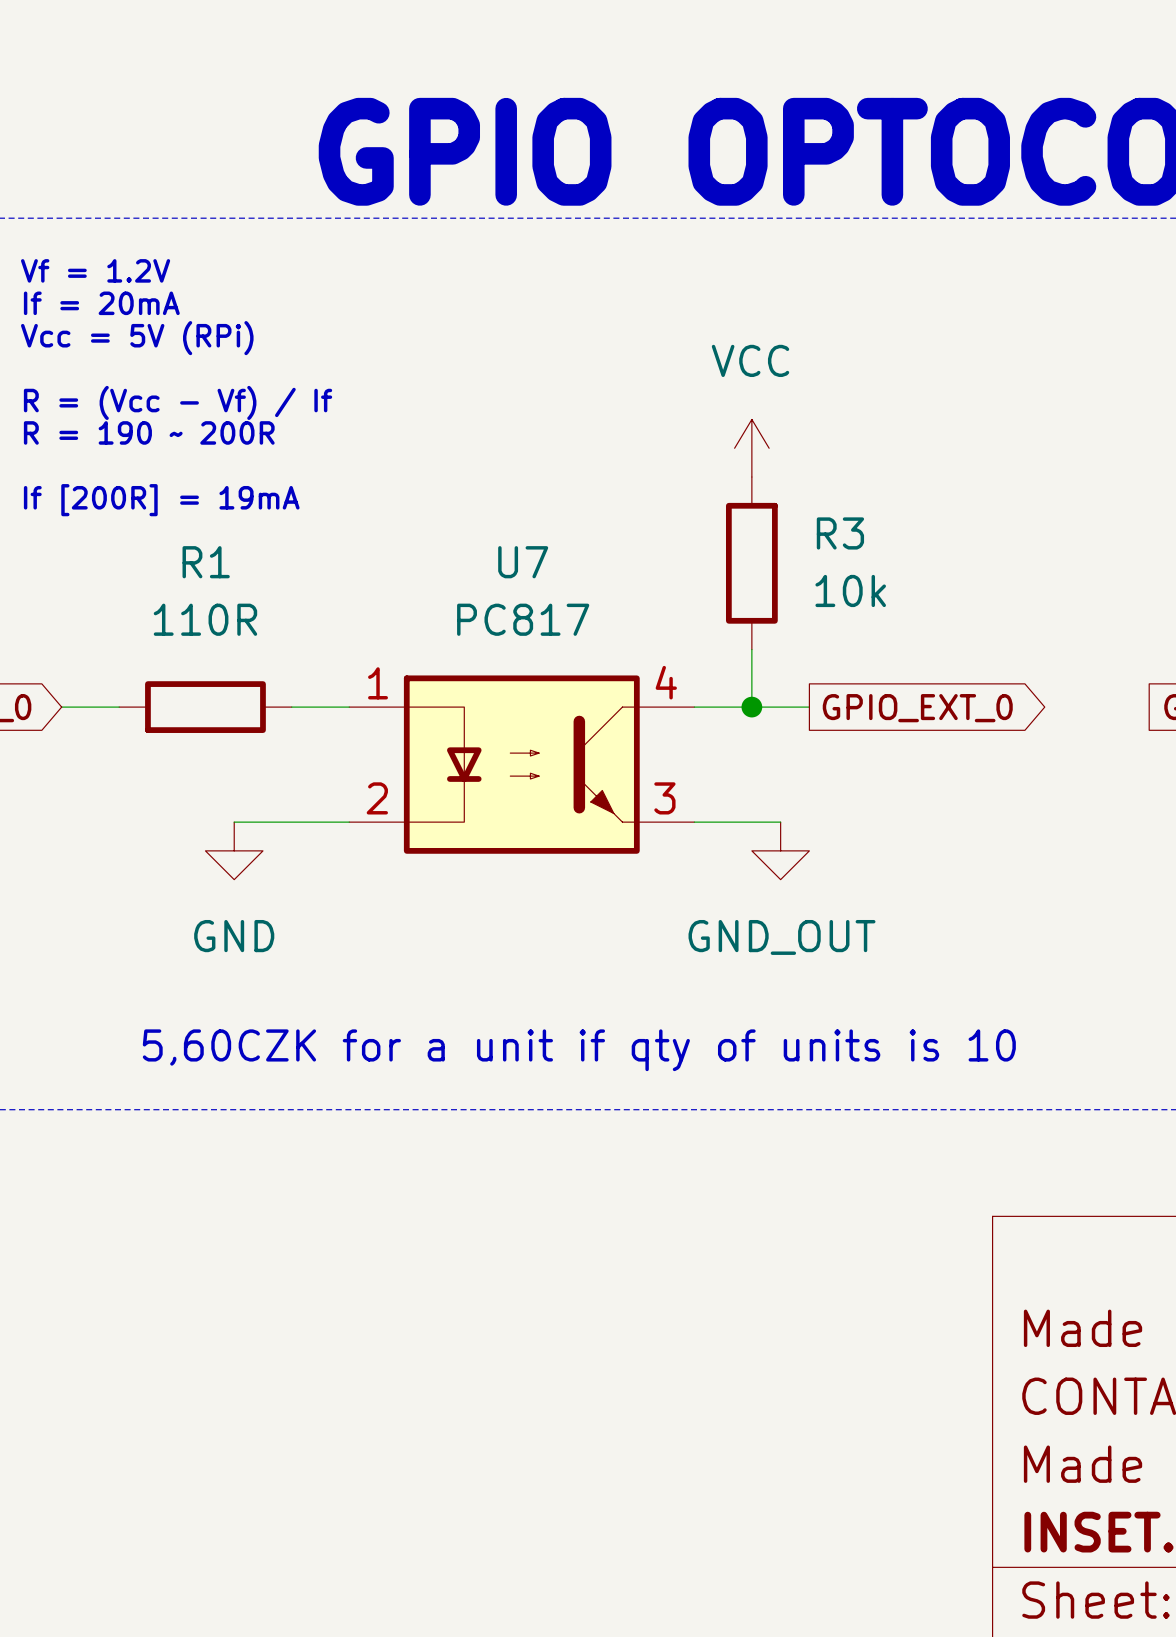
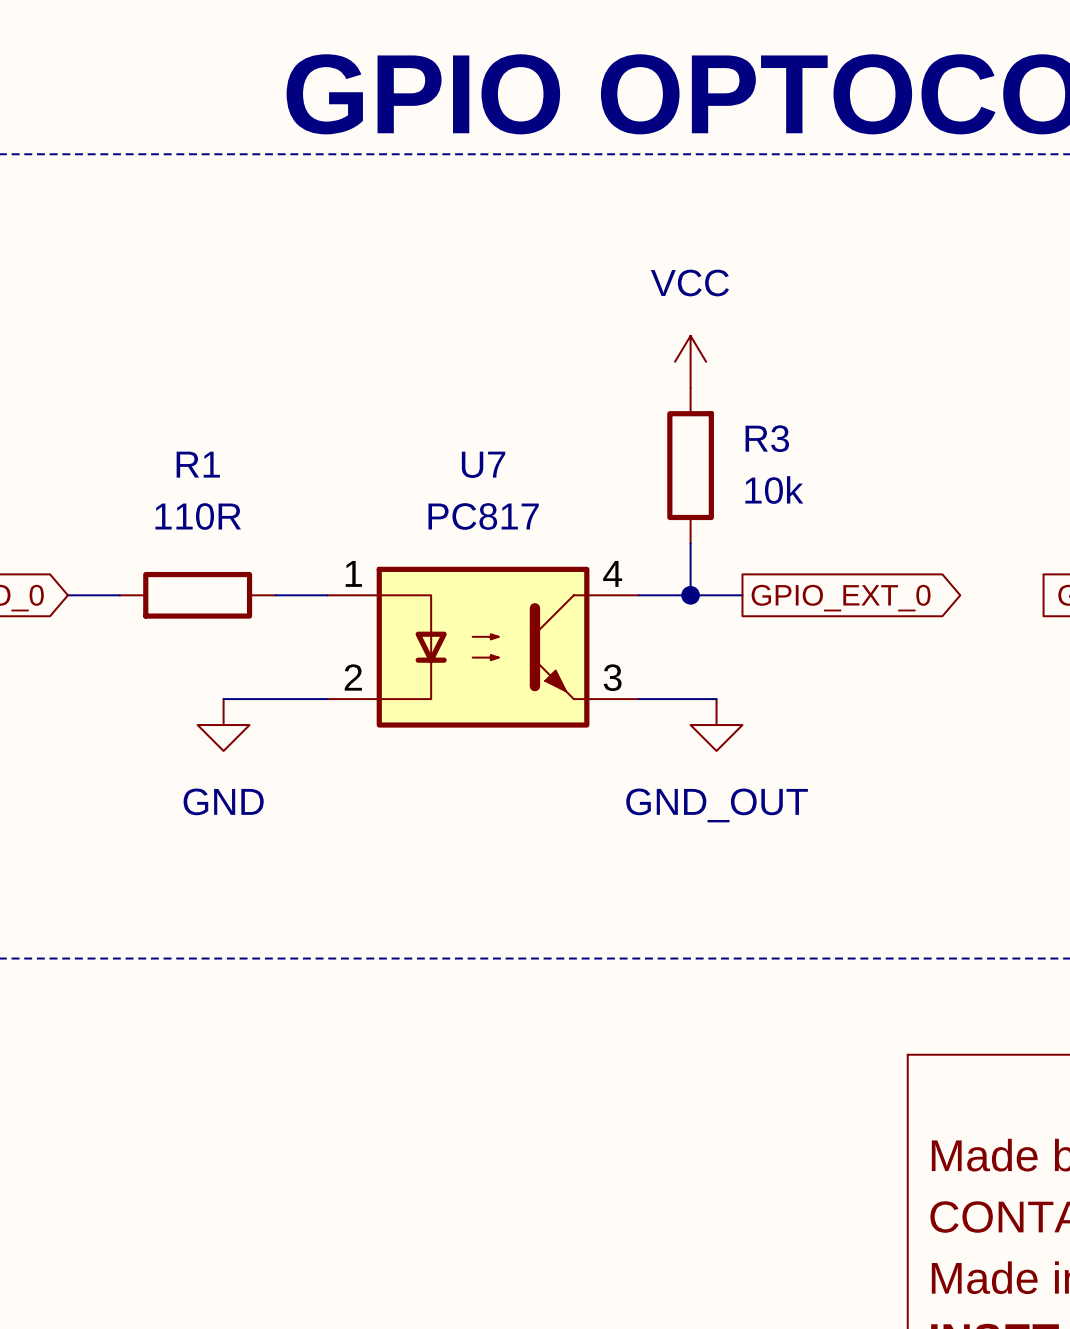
text: Vf = 1.2V (95, 270) -> none
text: If = 20mA (101, 303) -> none
text: Vcc = 5V (RPi) (137, 338) -> none
text: R = (Vcc - Vf) / If (178, 402) -> none
text: R = 190 ~ 200R (149, 432) -> none
text: If [200R] = 19mA (161, 500) -> none
text: 5,60CZK for a unit if qty of units is 10 (579, 1050) -> none

